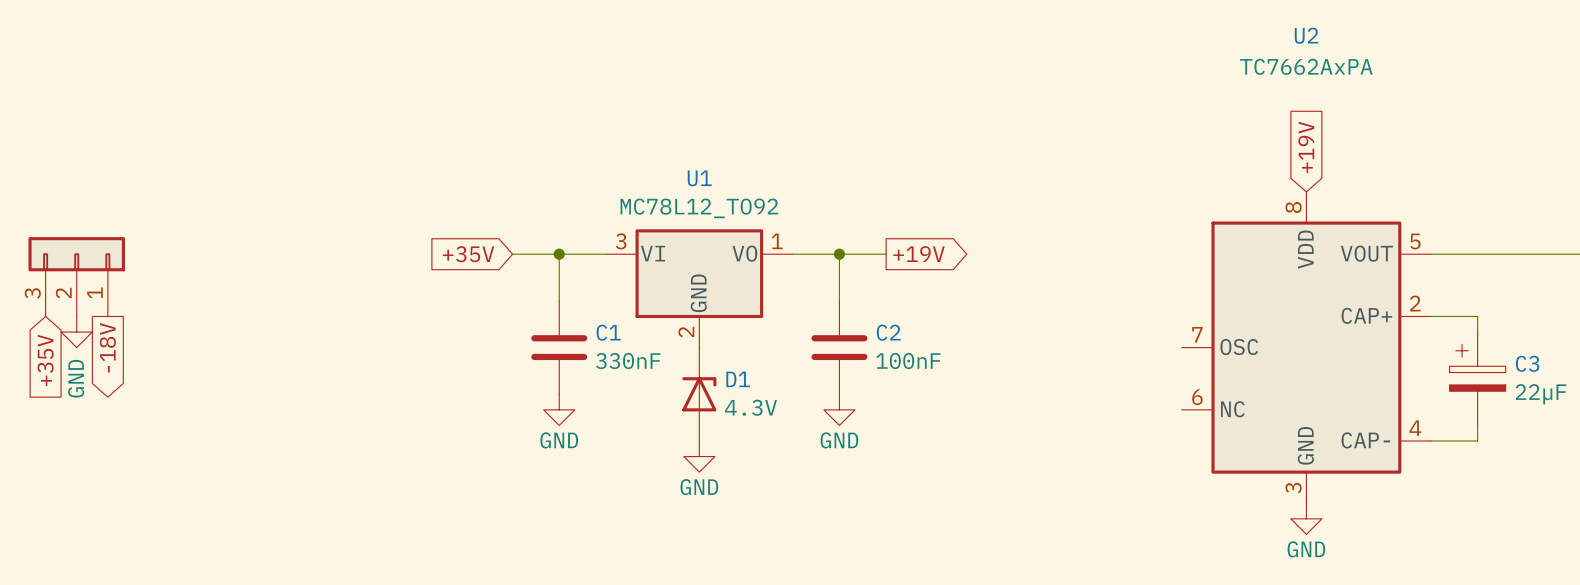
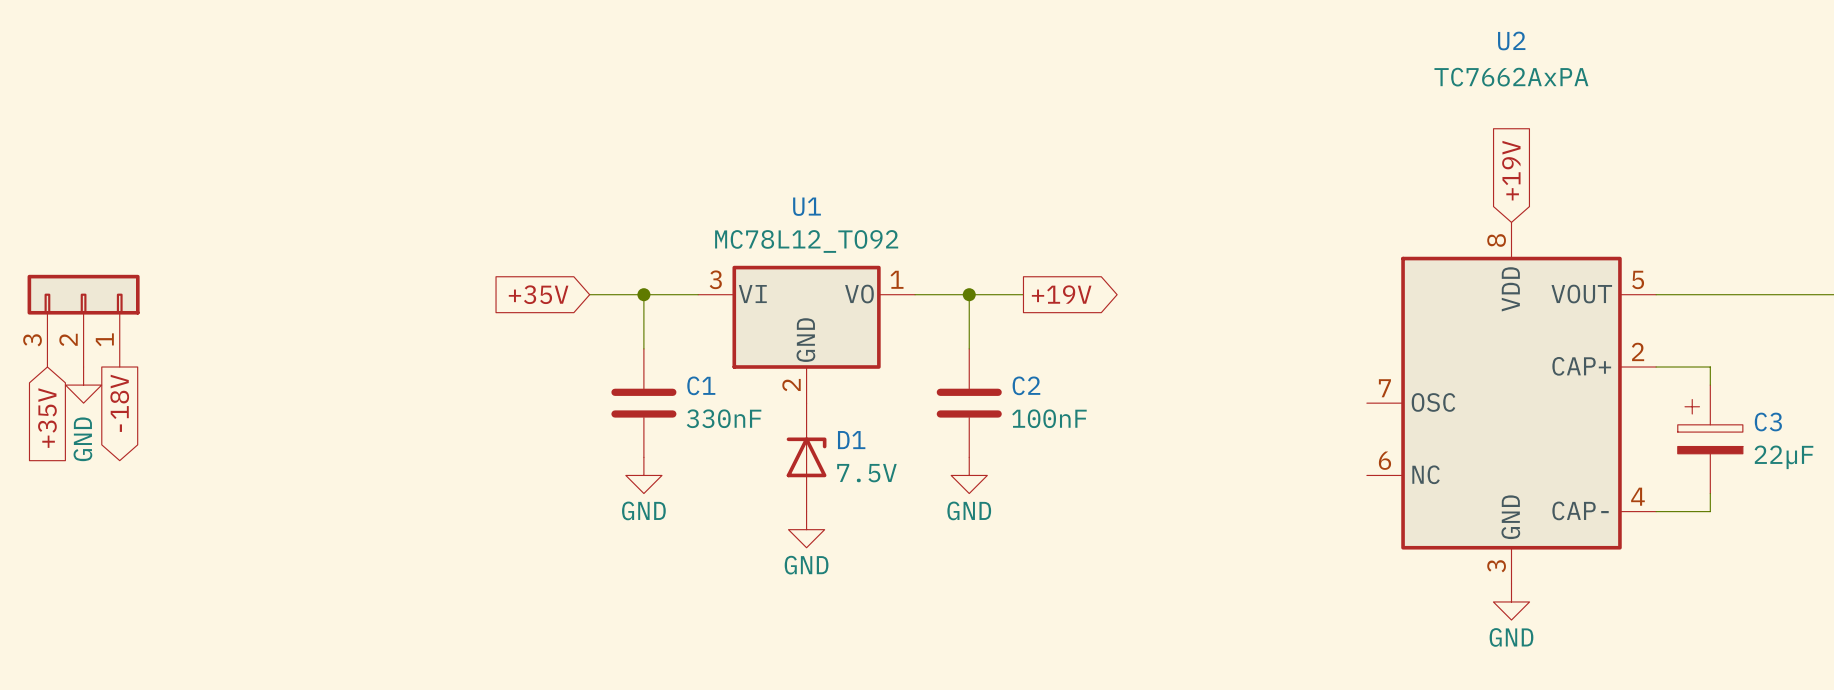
D1 value: 4.3V (750, 407) -> 7.5V (866, 473)

